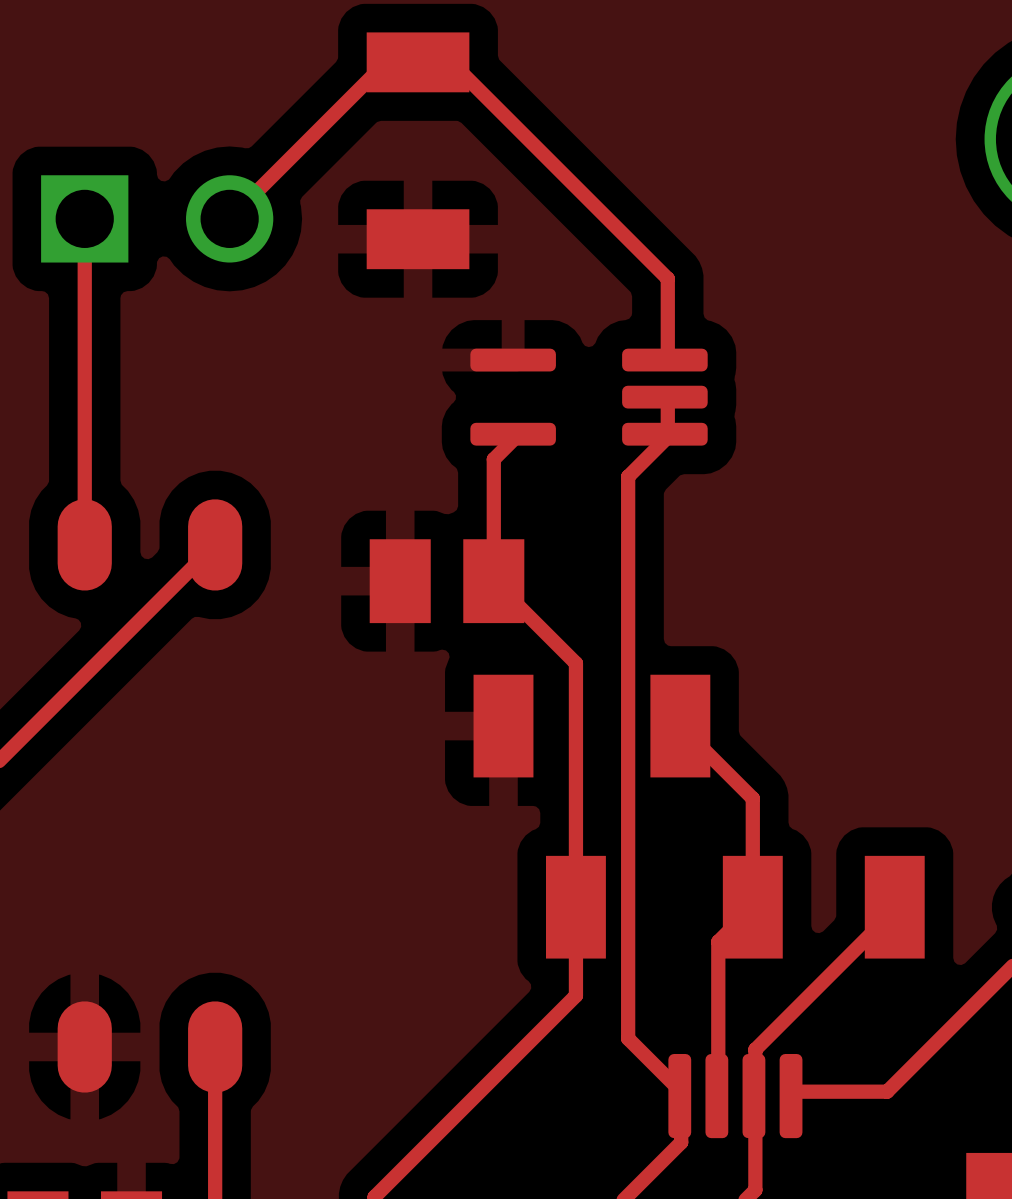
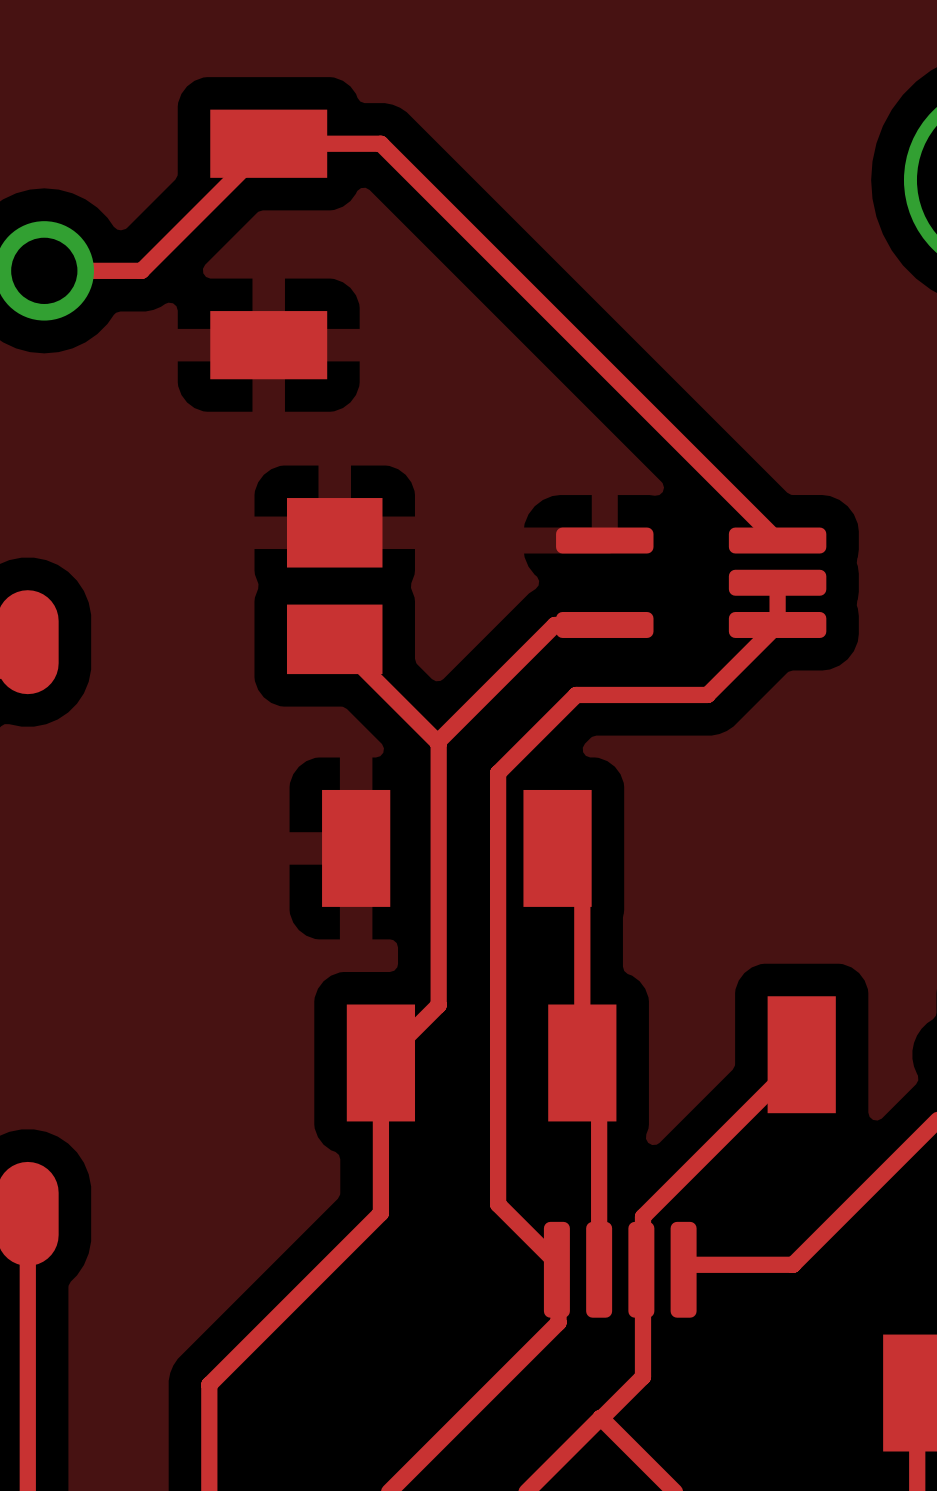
part position: (418, 150) -> (268, 244)
top track: (229, 218) (390, 58) (447, 58) (667, 278) (667, 362) -> (44, 270) (141, 270) (268, 143) (380, 143) (777, 540)
part position: (589, 397) -> (691, 582)
top track: (667, 400) (667, 437) (628, 476) (628, 659) -> (777, 582) (777, 624) (707, 694) (576, 694) (498, 773)
top track: (516, 437) (493, 459) (493, 581) (575, 663) -> (604, 624) (554, 624) (438, 741) (438, 776)
top track: none -> (334, 639) (438, 743)
part rotation: 0° (447, 581) -> 90° clockwise (334, 586)
part position: (447, 581) -> (334, 586)
top track: (702, 747) (752, 798) (752, 934) -> (582, 873) (582, 1062) (599, 1079) (599, 1269)
top track: (575, 863) (575, 995) (525, 1046) -> (438, 1005) (380, 1062) (380, 1213)
part position: (664, 907) -> (481, 1062)
top track: (752, 907) (718, 941) (718, 1091) -> none

